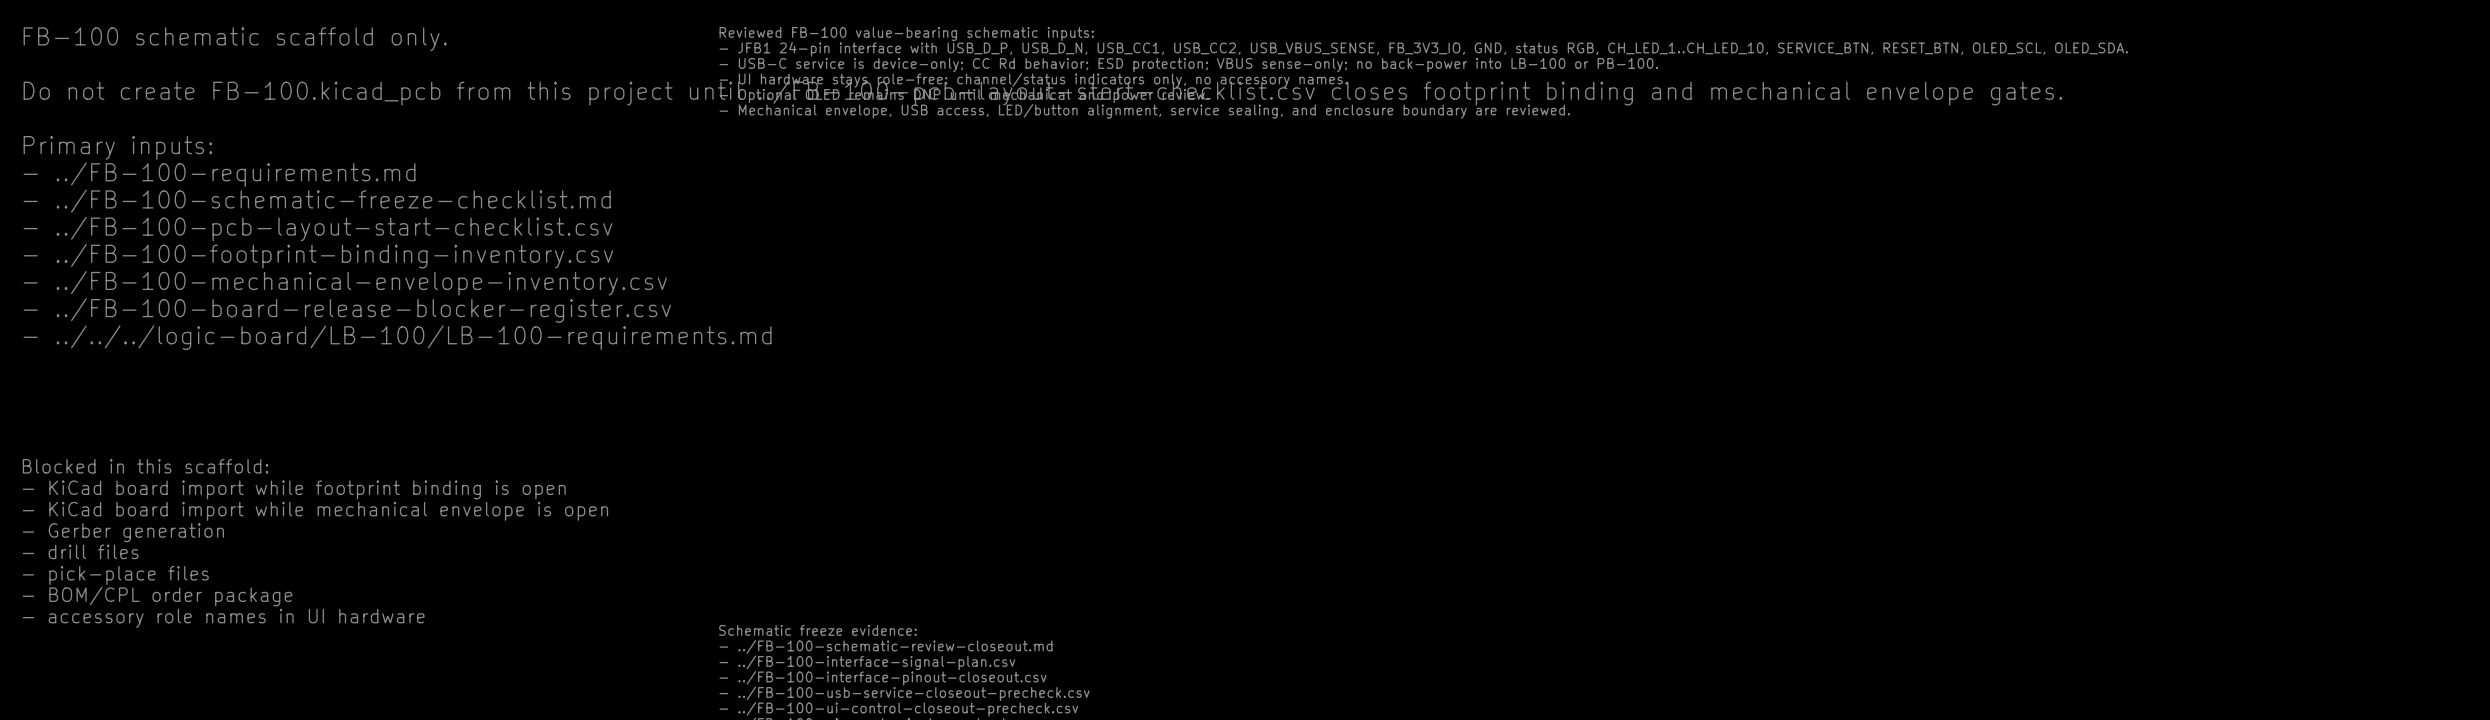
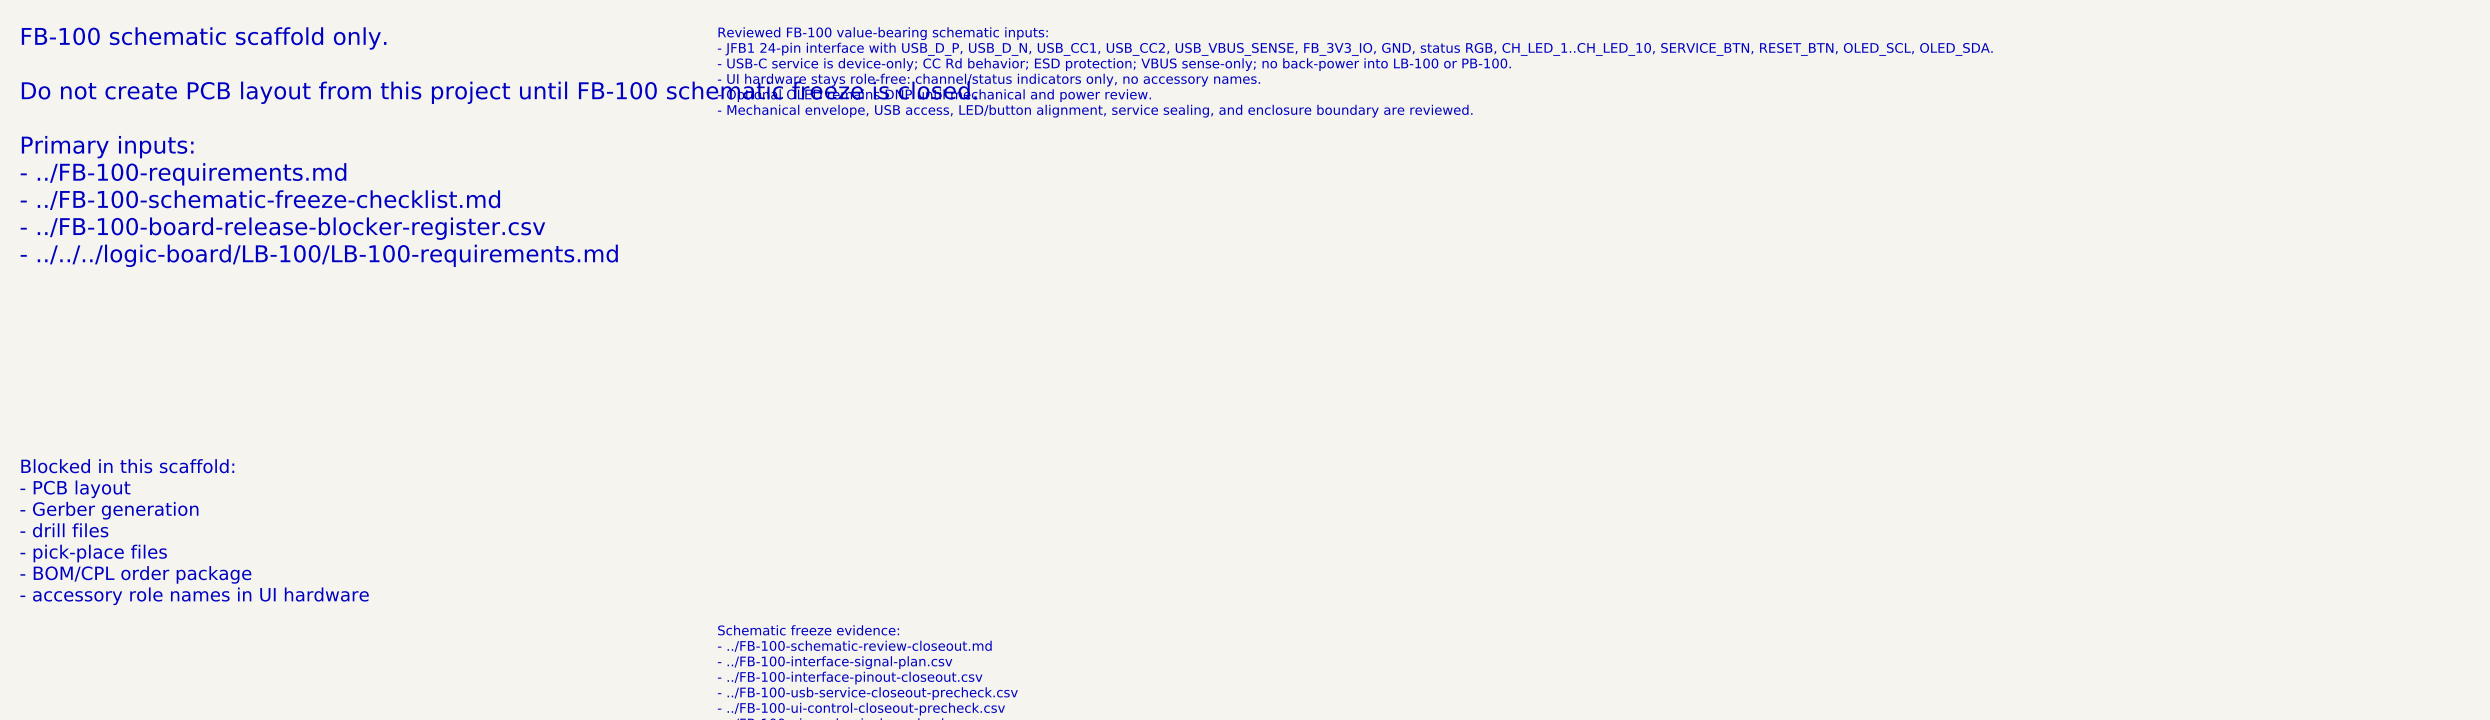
text: Do not create FB-100.kicad_pcb from this project until ../FB-100-pcb-layout-start-checklist.csv closes footprint binding and mechanical envelope gates. (1042, 93) -> Do not create PCB layout from this project until FB-100 schematic freeze is closed. (499, 92)
text: - ../FB-100-pcb-layout-start-checklist.csv (317, 229) -> - ../FB-100-board-release-blocker-register.csv (282, 228)
text: - ../FB-100-footprint-binding-inventory.csv (318, 256) -> - ../../../logic-board/LB-100/LB-100-requirements.md (319, 255)
text: - ../FB-100-mechanical-envelope-inventory.csv (345, 283) -> none
text: - ../FB-100-board-release-blocker-register.csv (347, 310) -> none
text: - ../../../logic-board/LB-100/LB-100-requirements.md (397, 337) -> none
text: - KiCad board import while footprint binding is open (294, 489) -> - PCB layout (75, 489)
text: - KiCad board import while mechanical envelope is open (315, 511) -> - Gerber generation (109, 510)
text: - Gerber generation (123, 532) -> - drill files (64, 530)
text: - drill files (80, 551) -> - pick-place files (93, 553)
text: - pick-place files (115, 575) -> - BOM/CPL order package (135, 574)
text: - BOM/CPL order package (157, 596) -> - accessory role names in UI hardware (194, 596)
text: - accessory role names in UI hardware (223, 618) -> none

